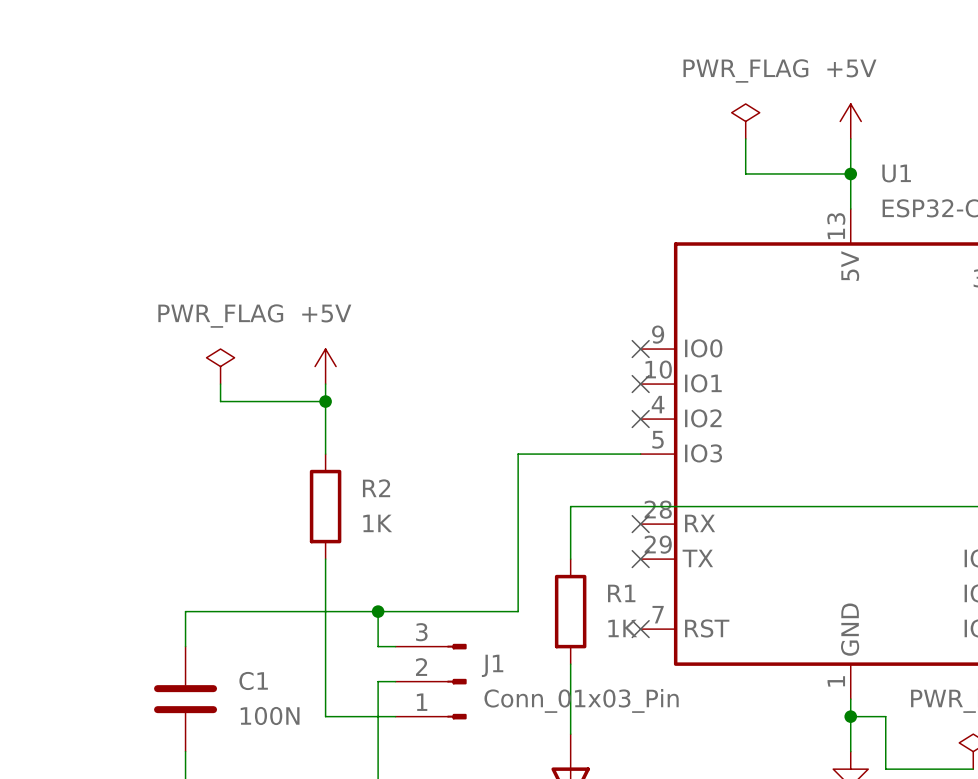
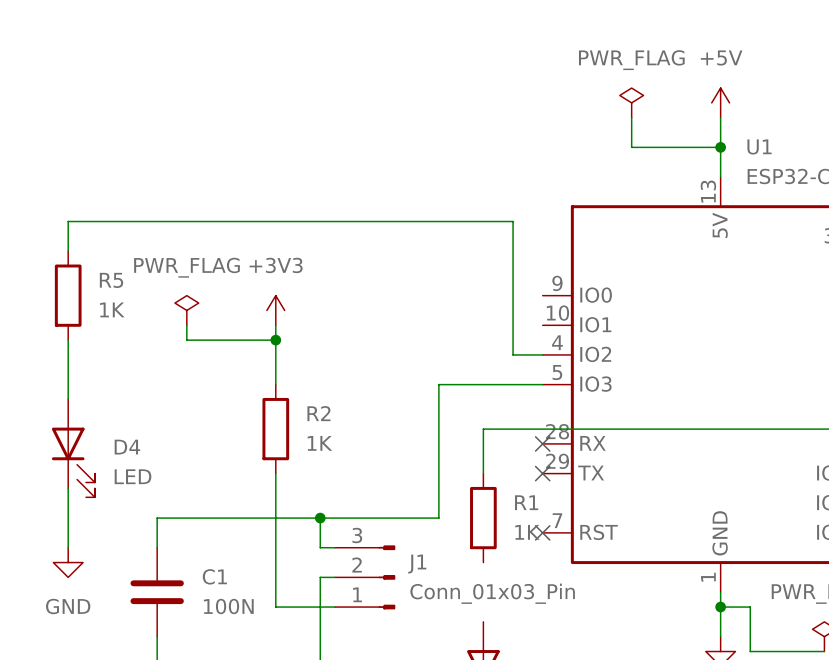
wire: none -> (68, 251) (68, 221) (513, 221) (513, 354) (542, 354)
R5: none -> 1K (68, 295)
no-connect mark: (640, 349) -> none
power symbol: +5V (325, 366) -> +3V3 (275, 310)
no-connect mark: (640, 384) -> none
wire: none -> (68, 340) (68, 399)
no-connect mark: (640, 419) -> none
D4: none -> LED (73, 448)
wire: none -> (68, 488) (68, 547)
power symbol: none -> GND (68, 562)
wire: (570, 664) (570, 734) -> none

